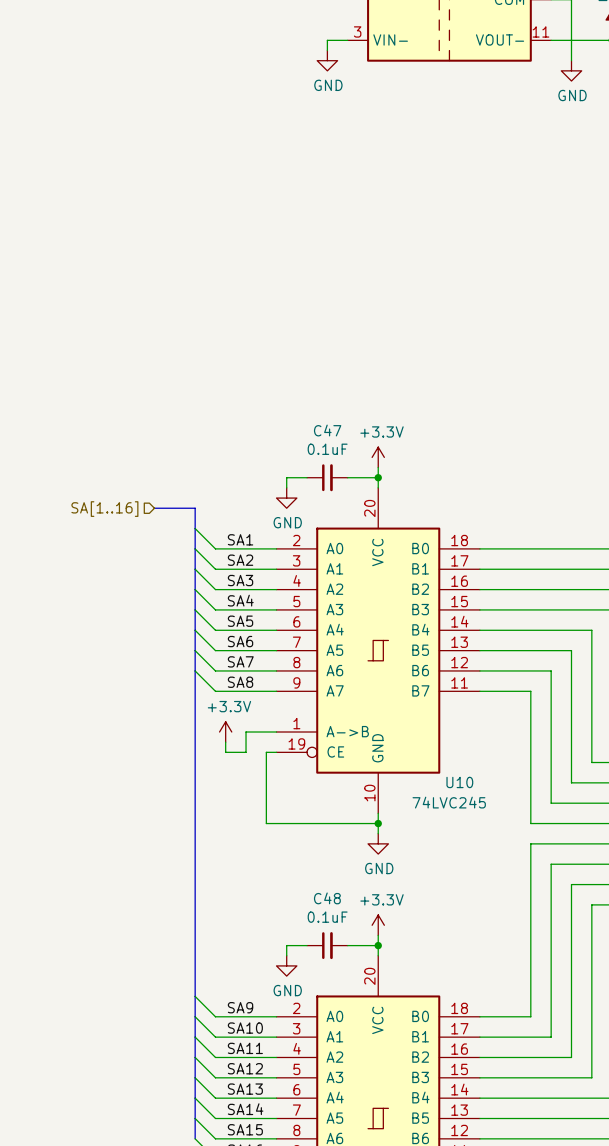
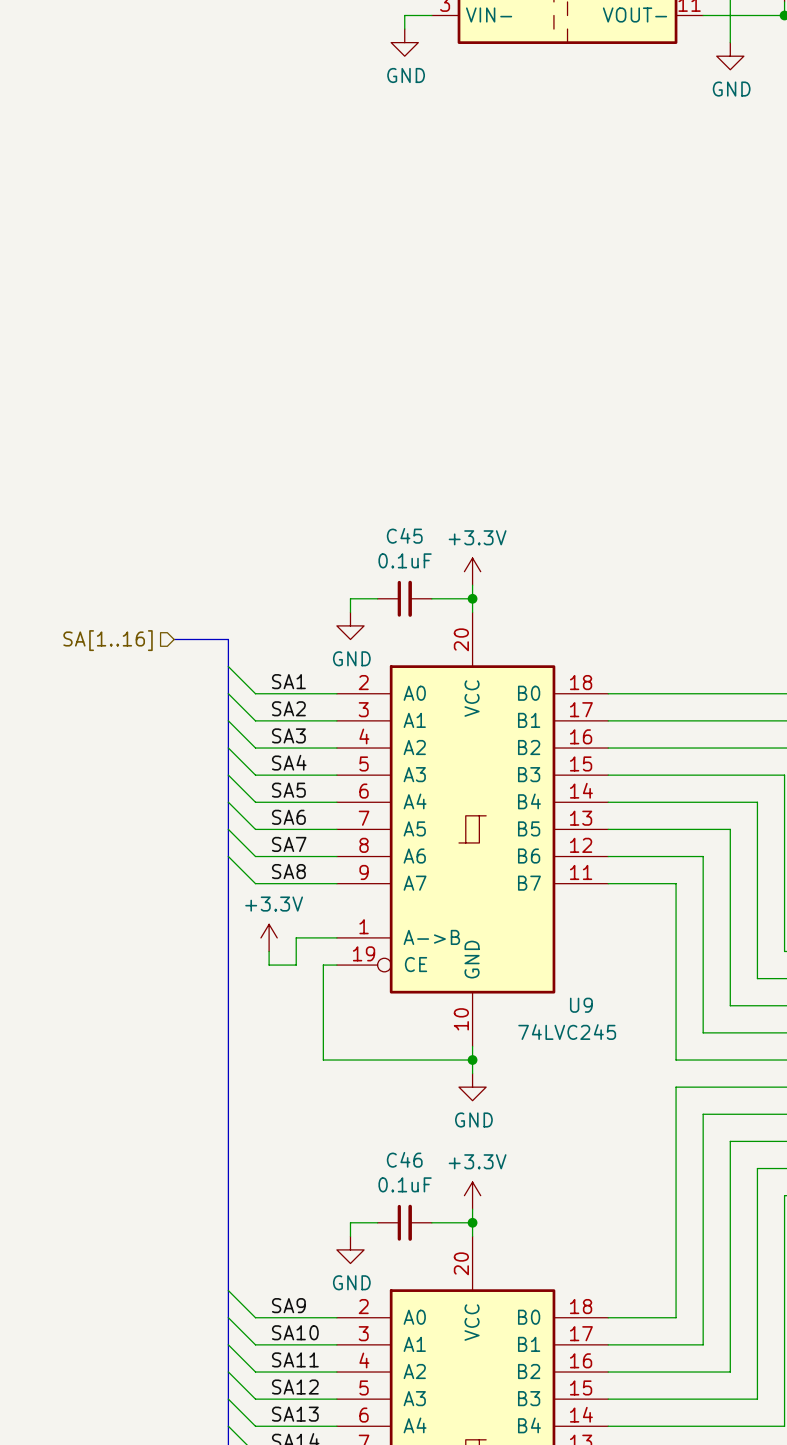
C47 name: C47 (327, 430) -> C45 (404, 535)
U10 name: U10 (459, 782) -> U9 (581, 1005)
C48 name: C48 (327, 898) -> C46 (404, 1159)

